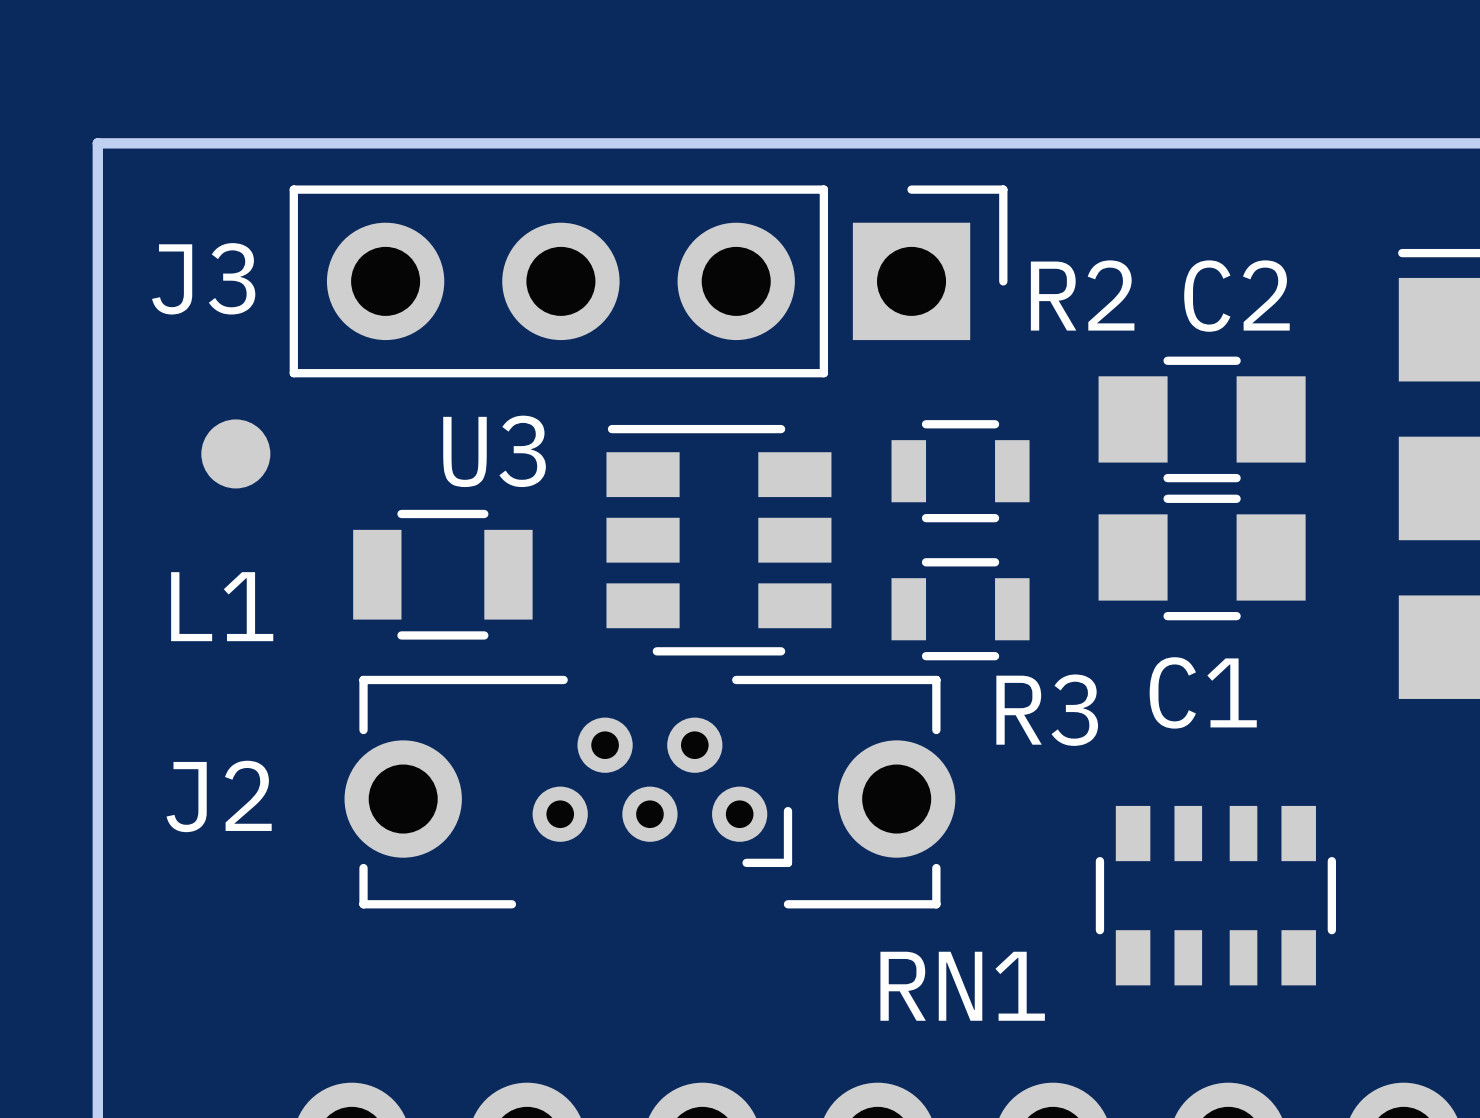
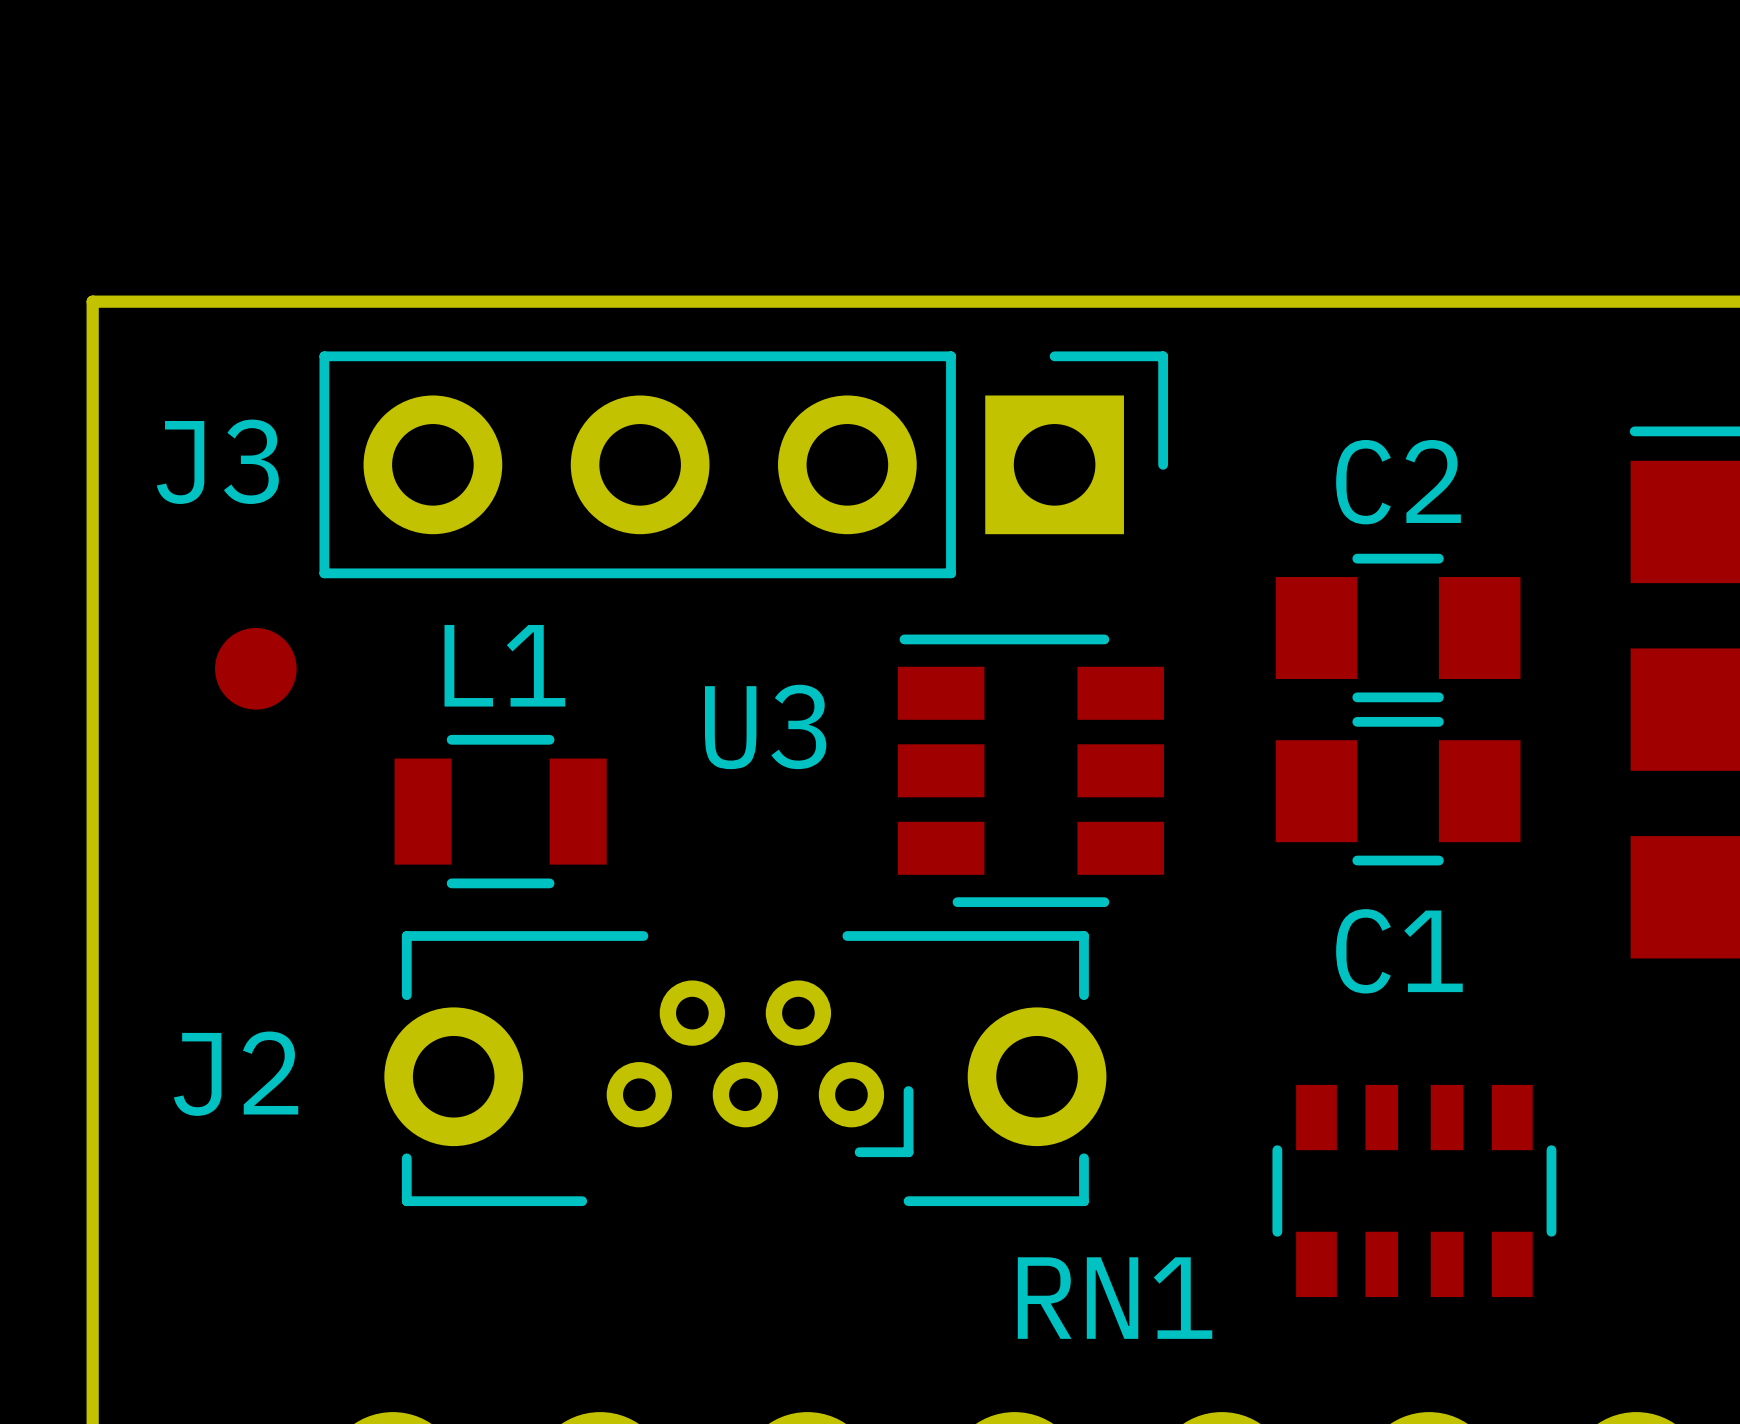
C2 name position: C2 (1236, 296) -> C2 (1398, 482)
U3 name position: U3 (494, 451) -> U3 (765, 726)
R2: (960, 471) -> none
U3 position: (718, 540) -> (1030, 770)
L1 name position: L1 (222, 606) -> L1 (504, 665)
R3: (960, 609) -> none

